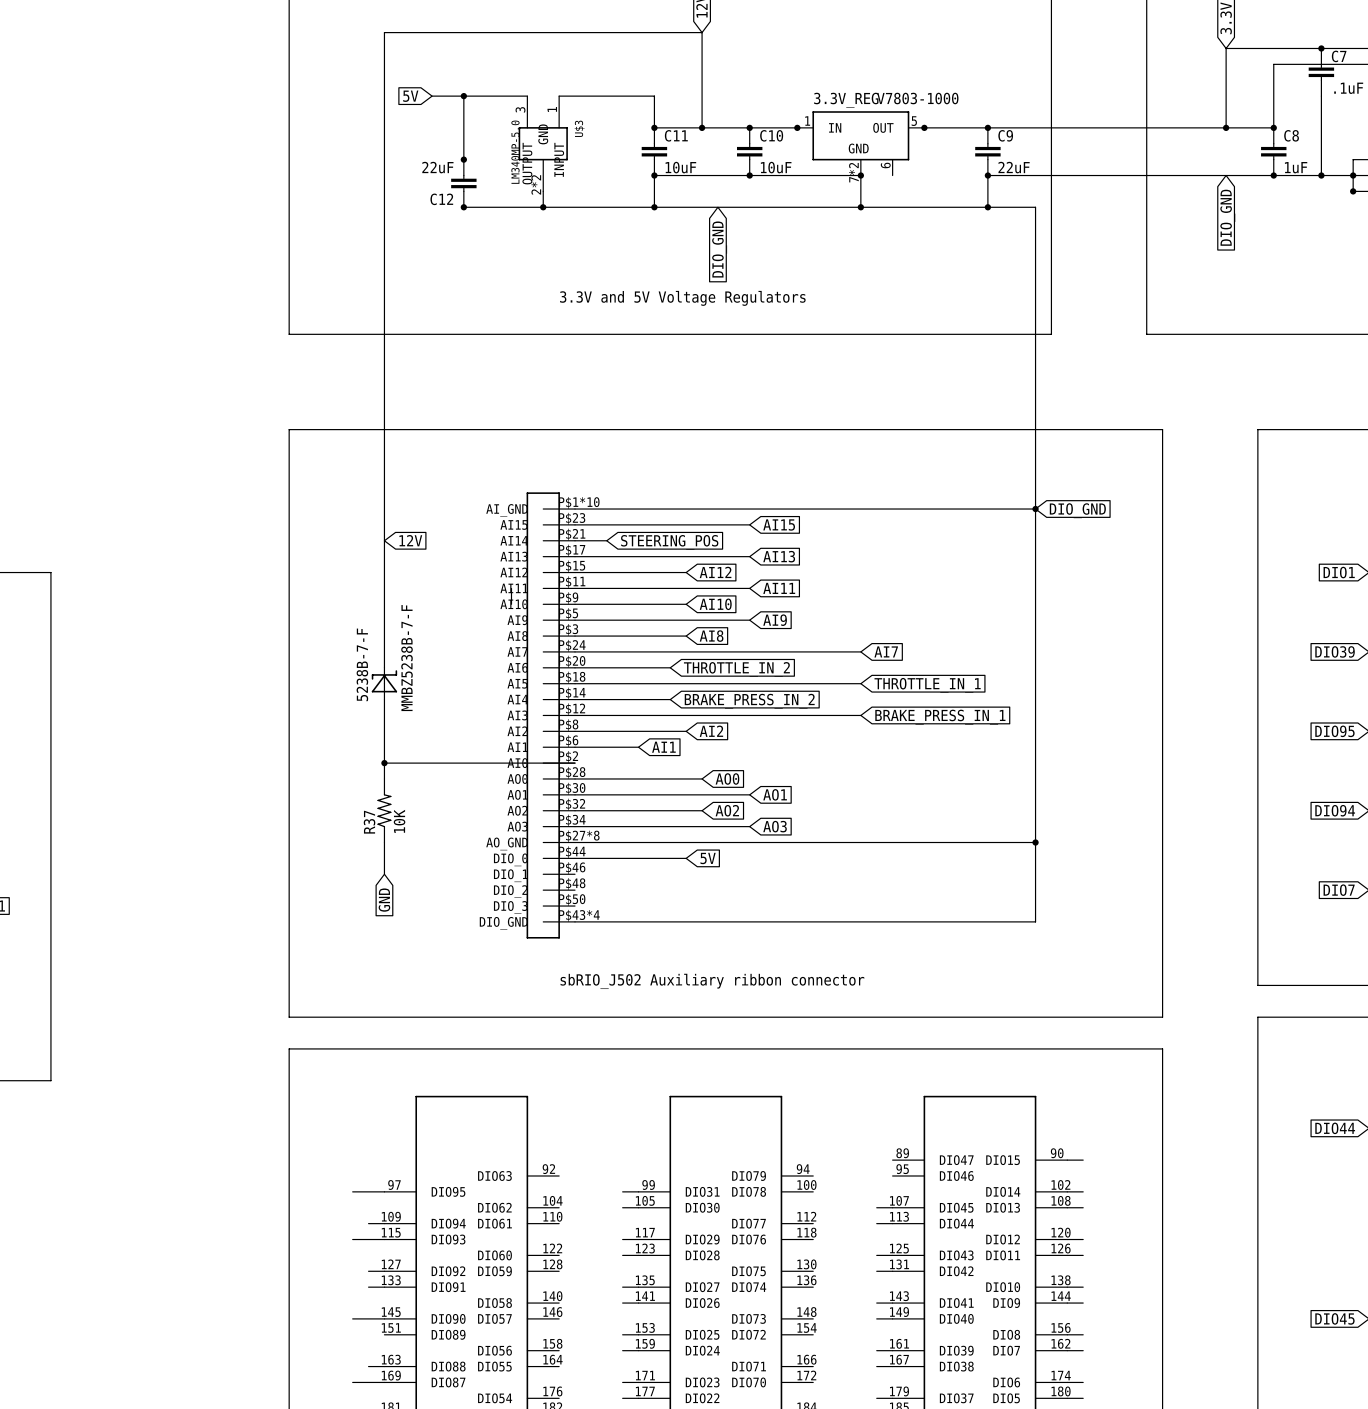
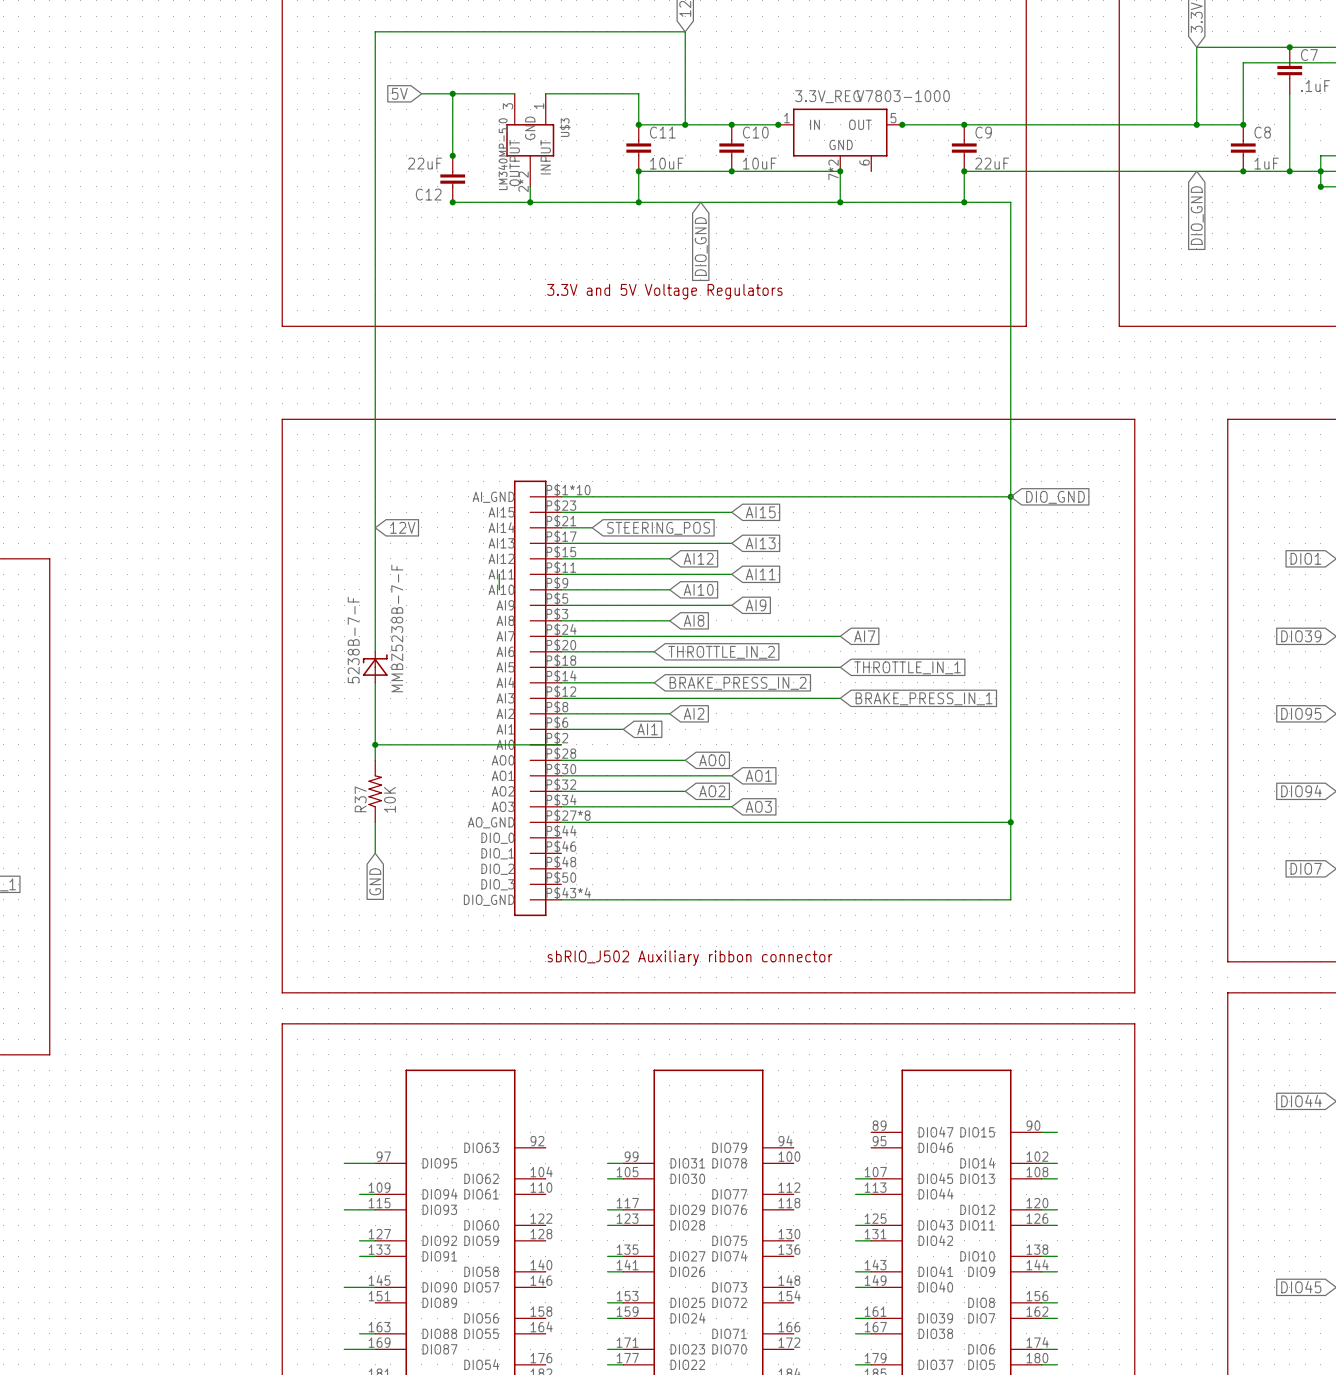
wire: (575, 858) (686, 858) -> none
global label: 5V (708, 858) -> none

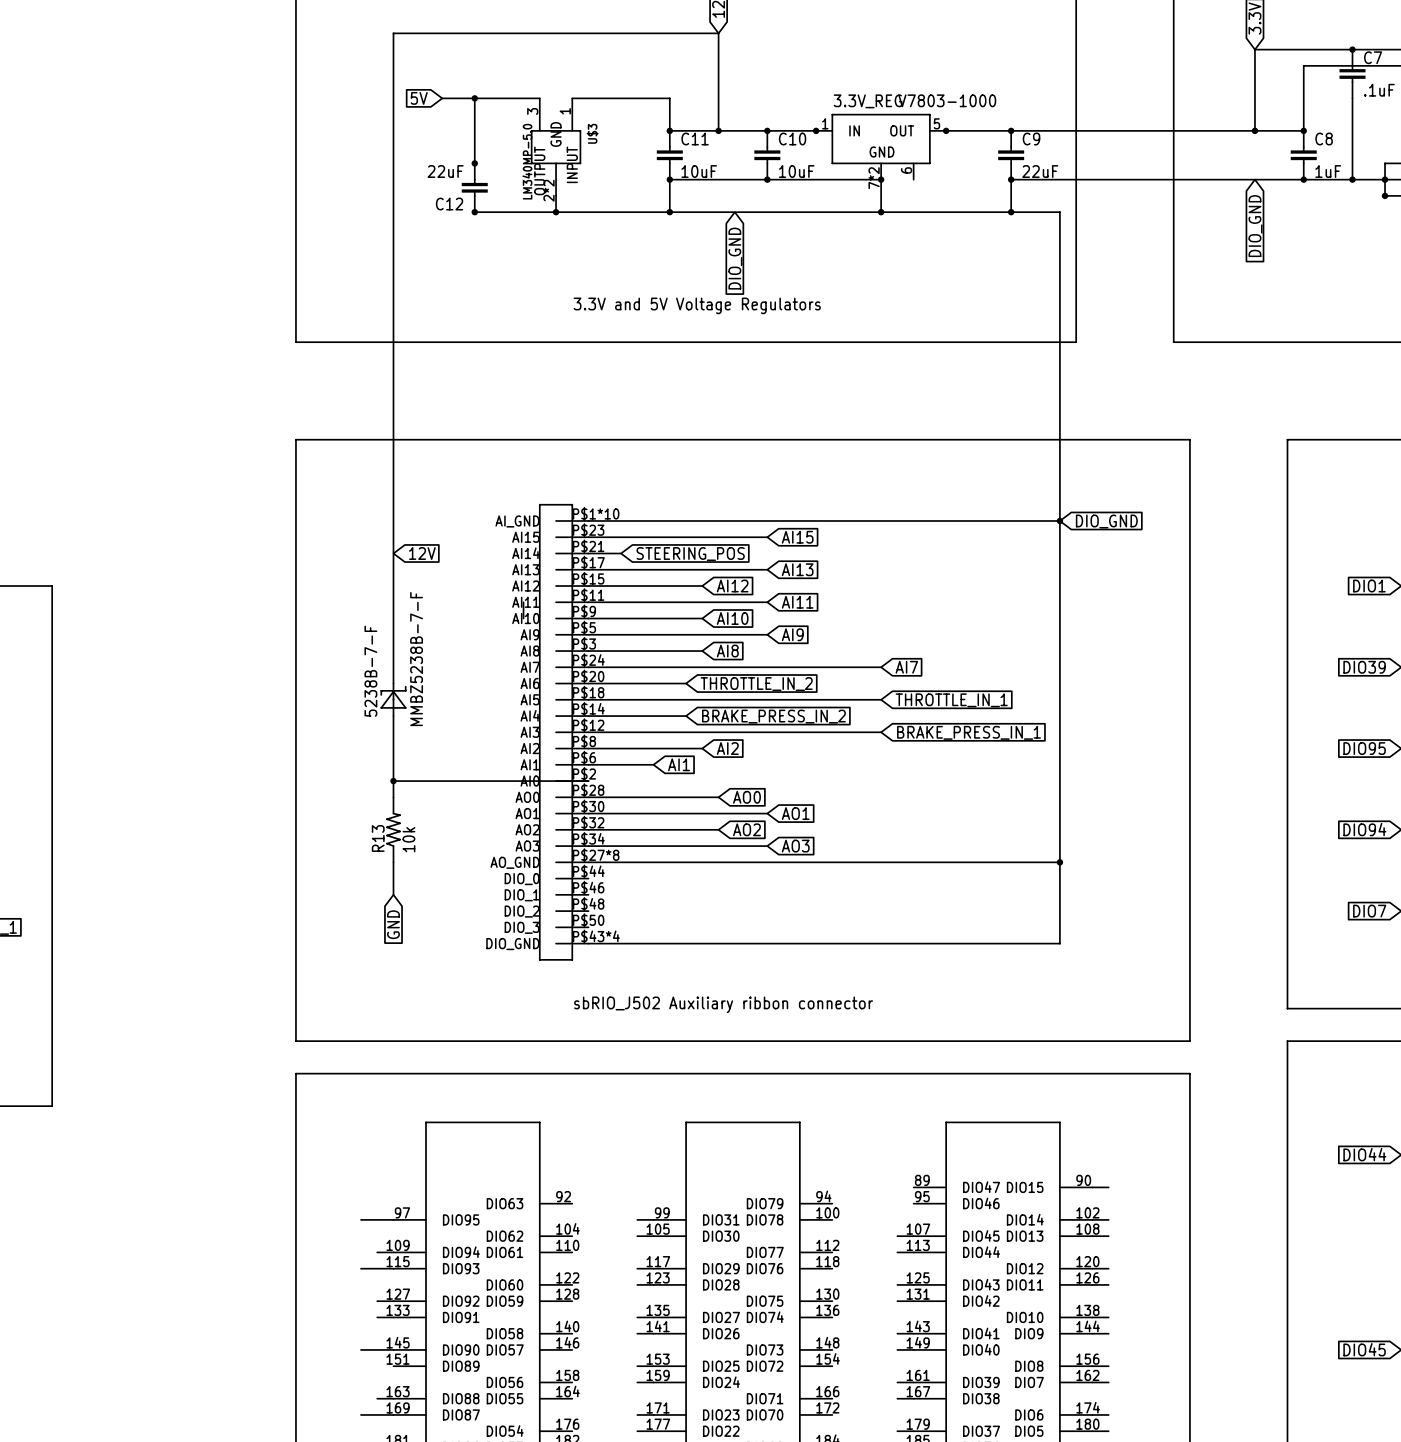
R37 name: R37 (360, 799) -> R13 (378, 838)
R37 value: 10K (389, 799) -> 10k (408, 839)

